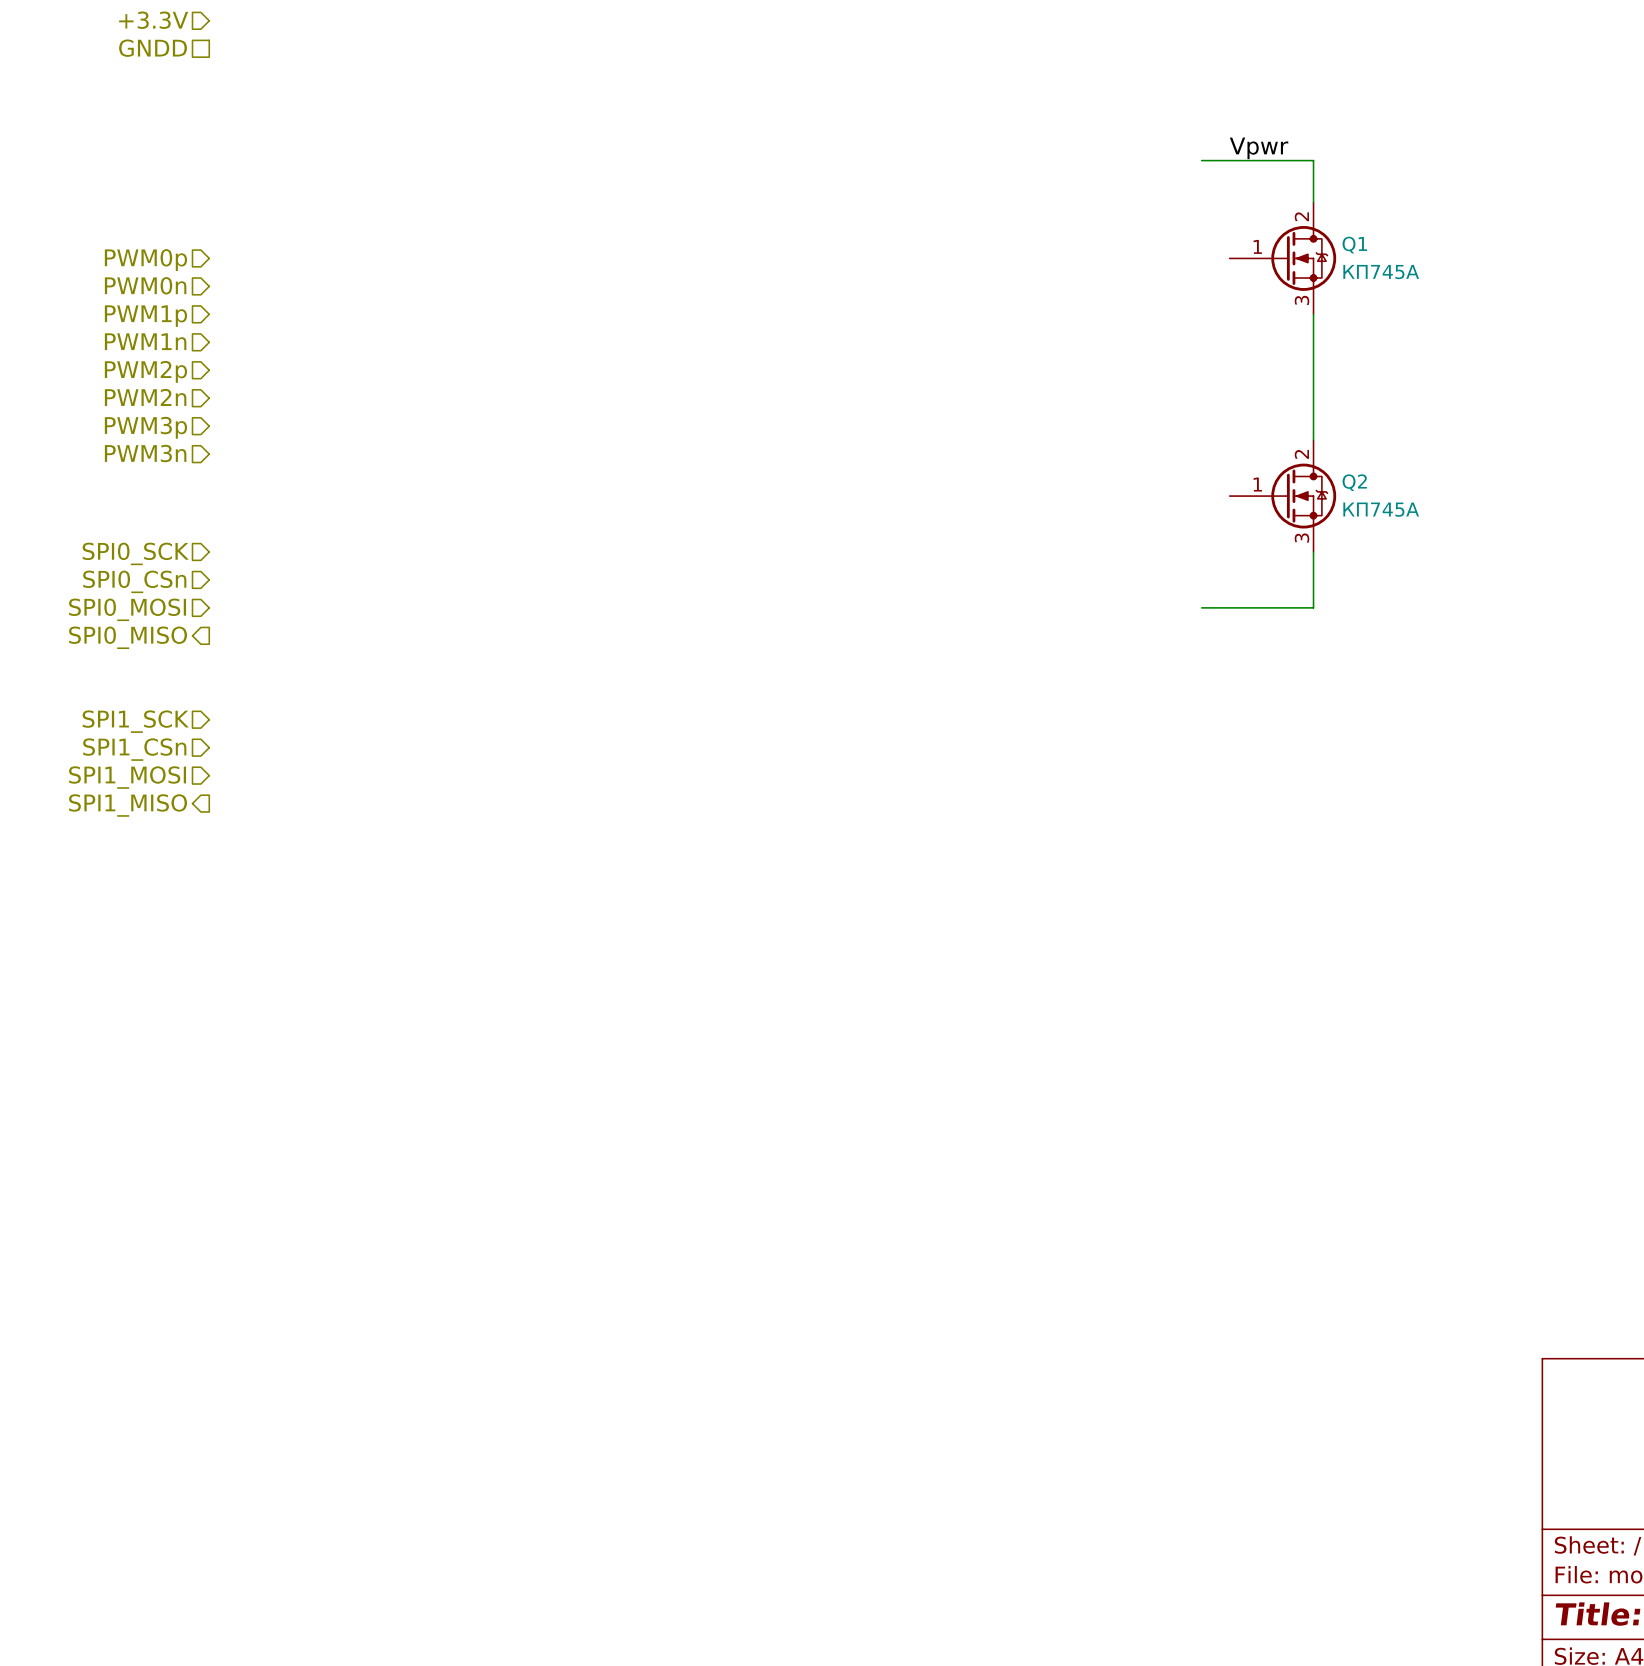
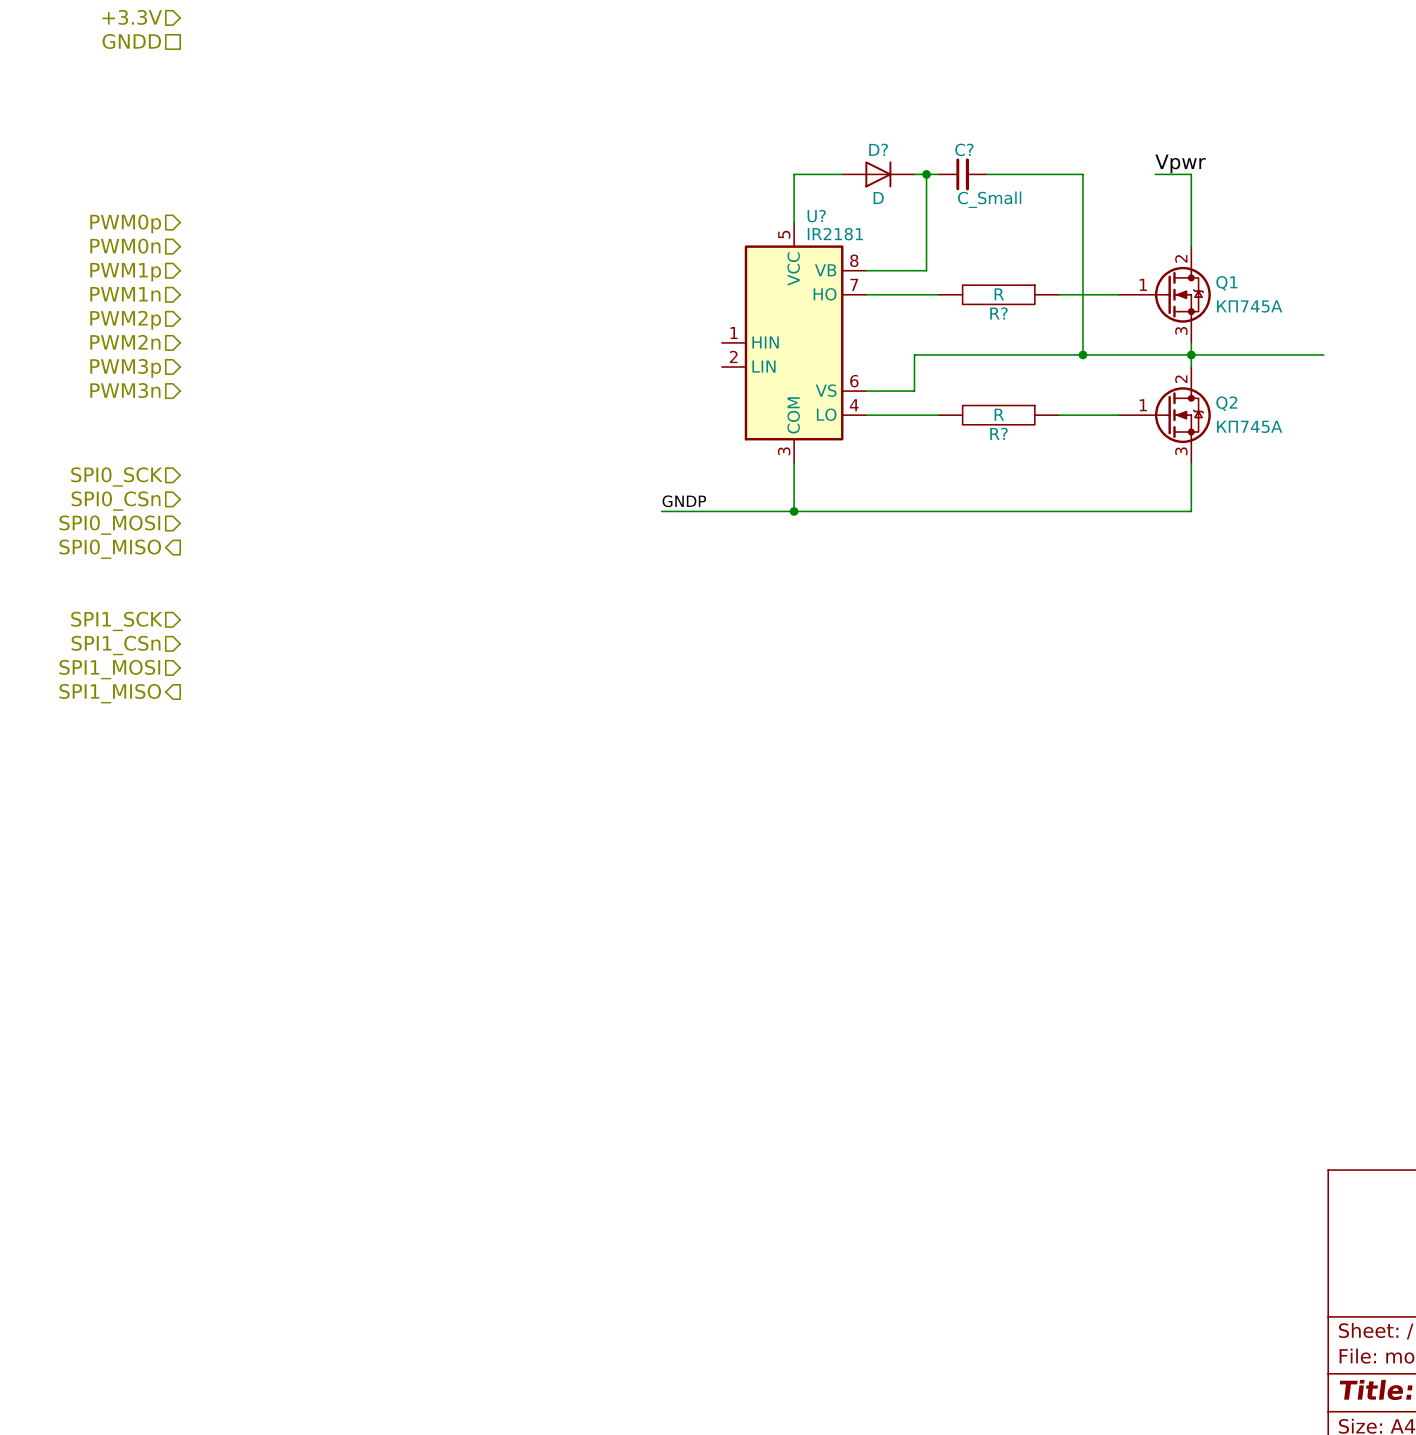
label position: Vpwr (1259, 148) -> Vpwr (1180, 163)
wire: (1201, 160) (1313, 160) (1313, 202) -> none
wire: none -> (842, 174) (794, 174) (794, 222)
D?: none -> D (878, 174)
wire: none -> (914, 174) (938, 174)
wire: none -> (926, 174) (926, 270) (866, 270)
junction: none -> (926, 174)
C?: none -> C_Small (962, 174)
wire: none -> (986, 174) (1082, 174) (1082, 354)
wire: none -> (1155, 174) (1191, 174) (1191, 246)
Q1 position: (1282, 258) -> (1164, 294)
wire: (1313, 314) (1313, 440) -> none
wire: none -> (866, 294) (938, 294)
R?: none -> R (998, 294)
wire: none -> (1058, 294) (1119, 294)
U?: none -> IR2181 (794, 342)
wire: none -> (1191, 342) (1191, 367)
junction: none -> (1082, 354)
junction: none -> (1191, 354)
wire: none -> (1323, 354) (914, 354) (914, 391) (866, 391)
wire: none -> (866, 415) (938, 415)
R?: none -> R (998, 415)
wire: none -> (1058, 415) (1119, 415)
Q2 position: (1282, 496) -> (1164, 415)
wire: none -> (794, 463) (794, 511)
wire: none -> (1191, 463) (1191, 511) (661, 511)
wire: (1313, 551) (1313, 607) (1201, 607) -> none
label: none -> GNDP (684, 501)
junction: none -> (794, 511)

